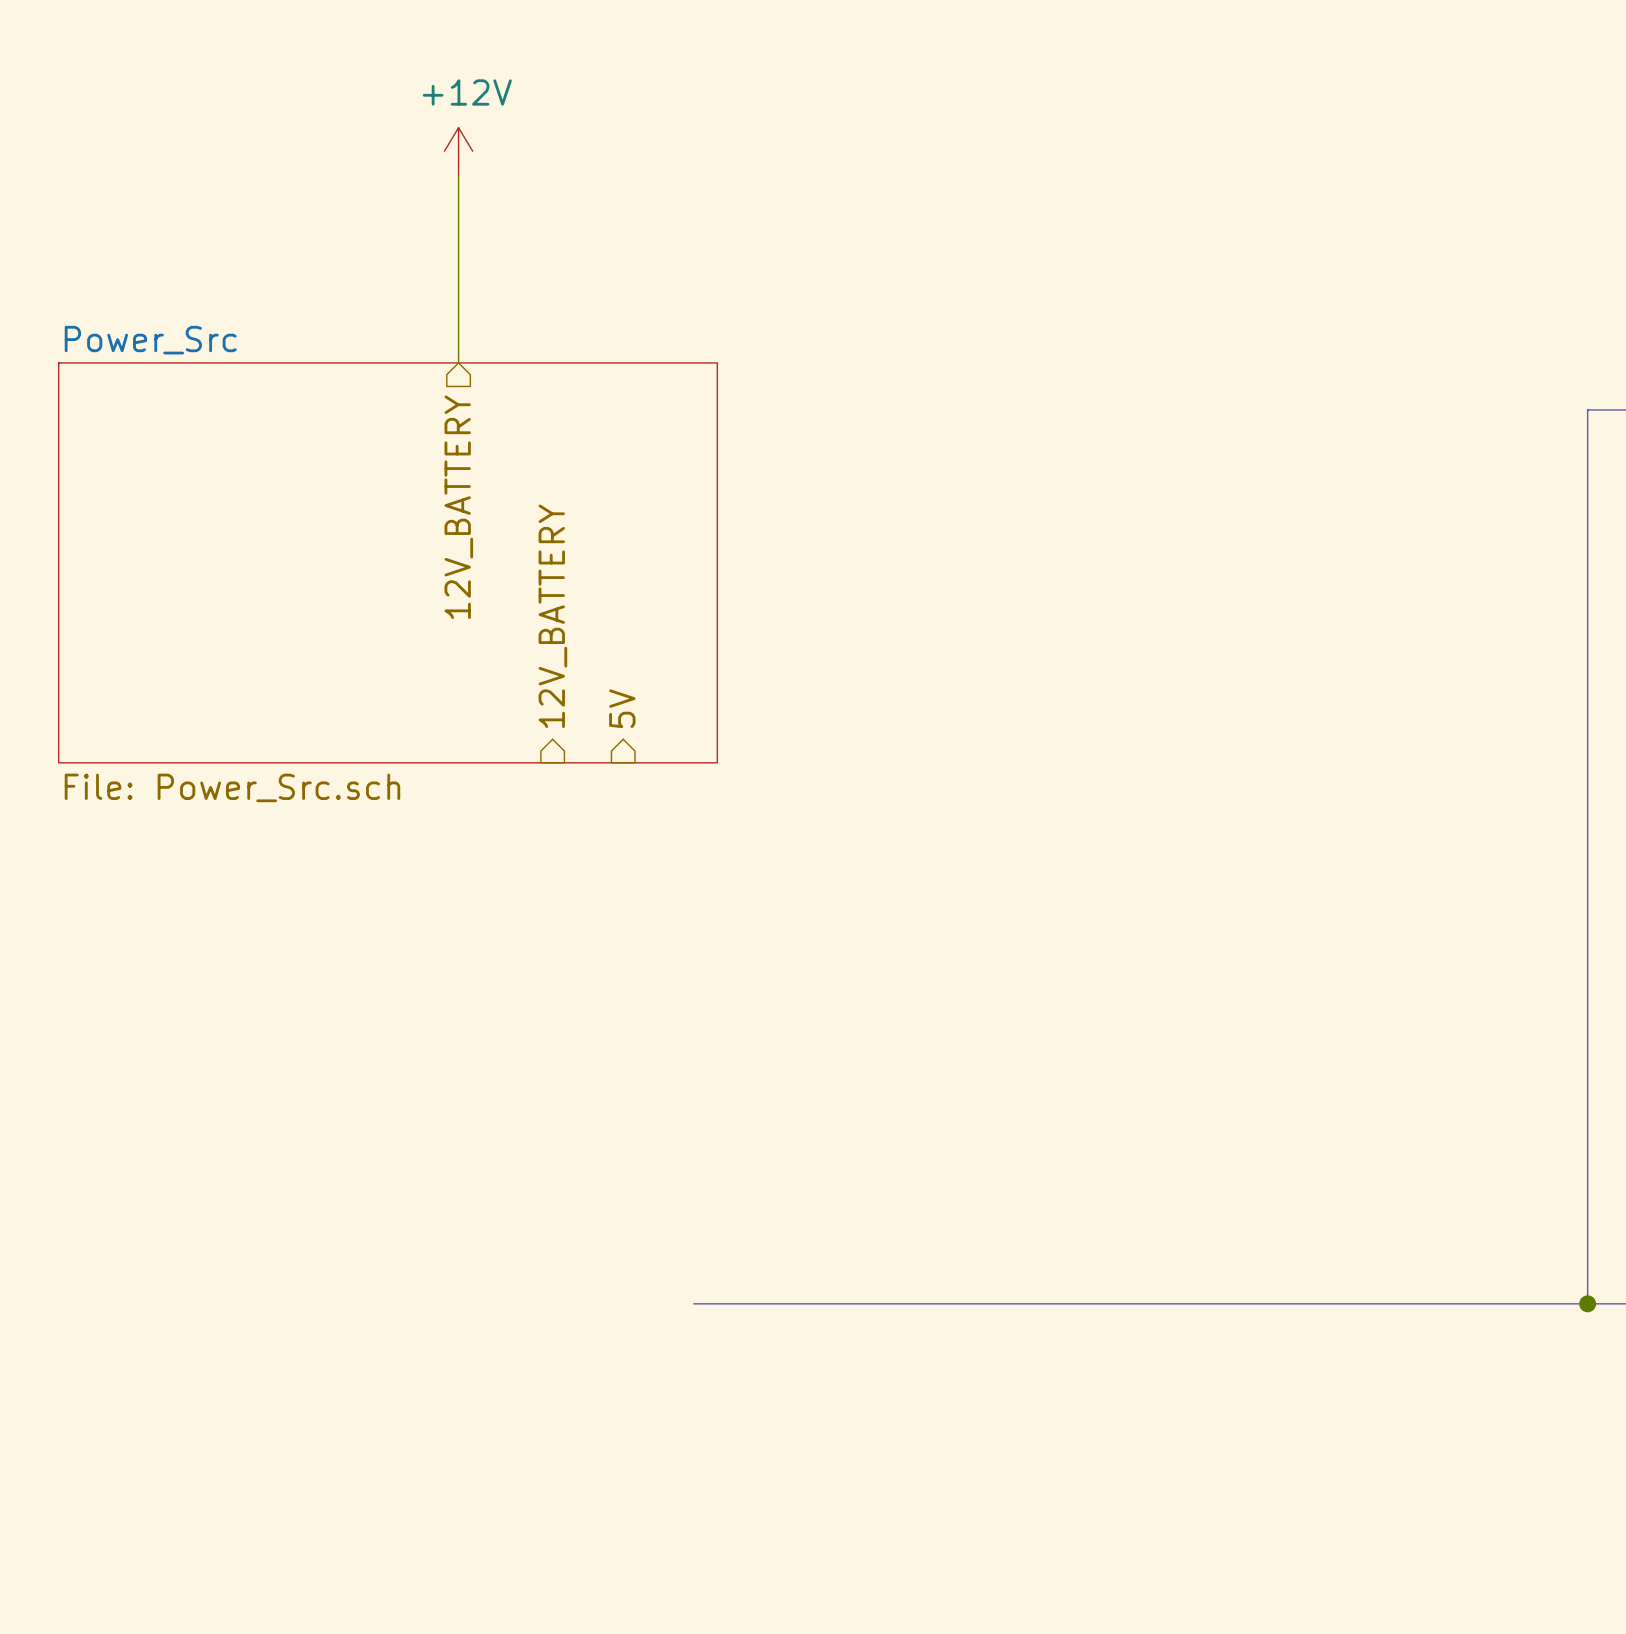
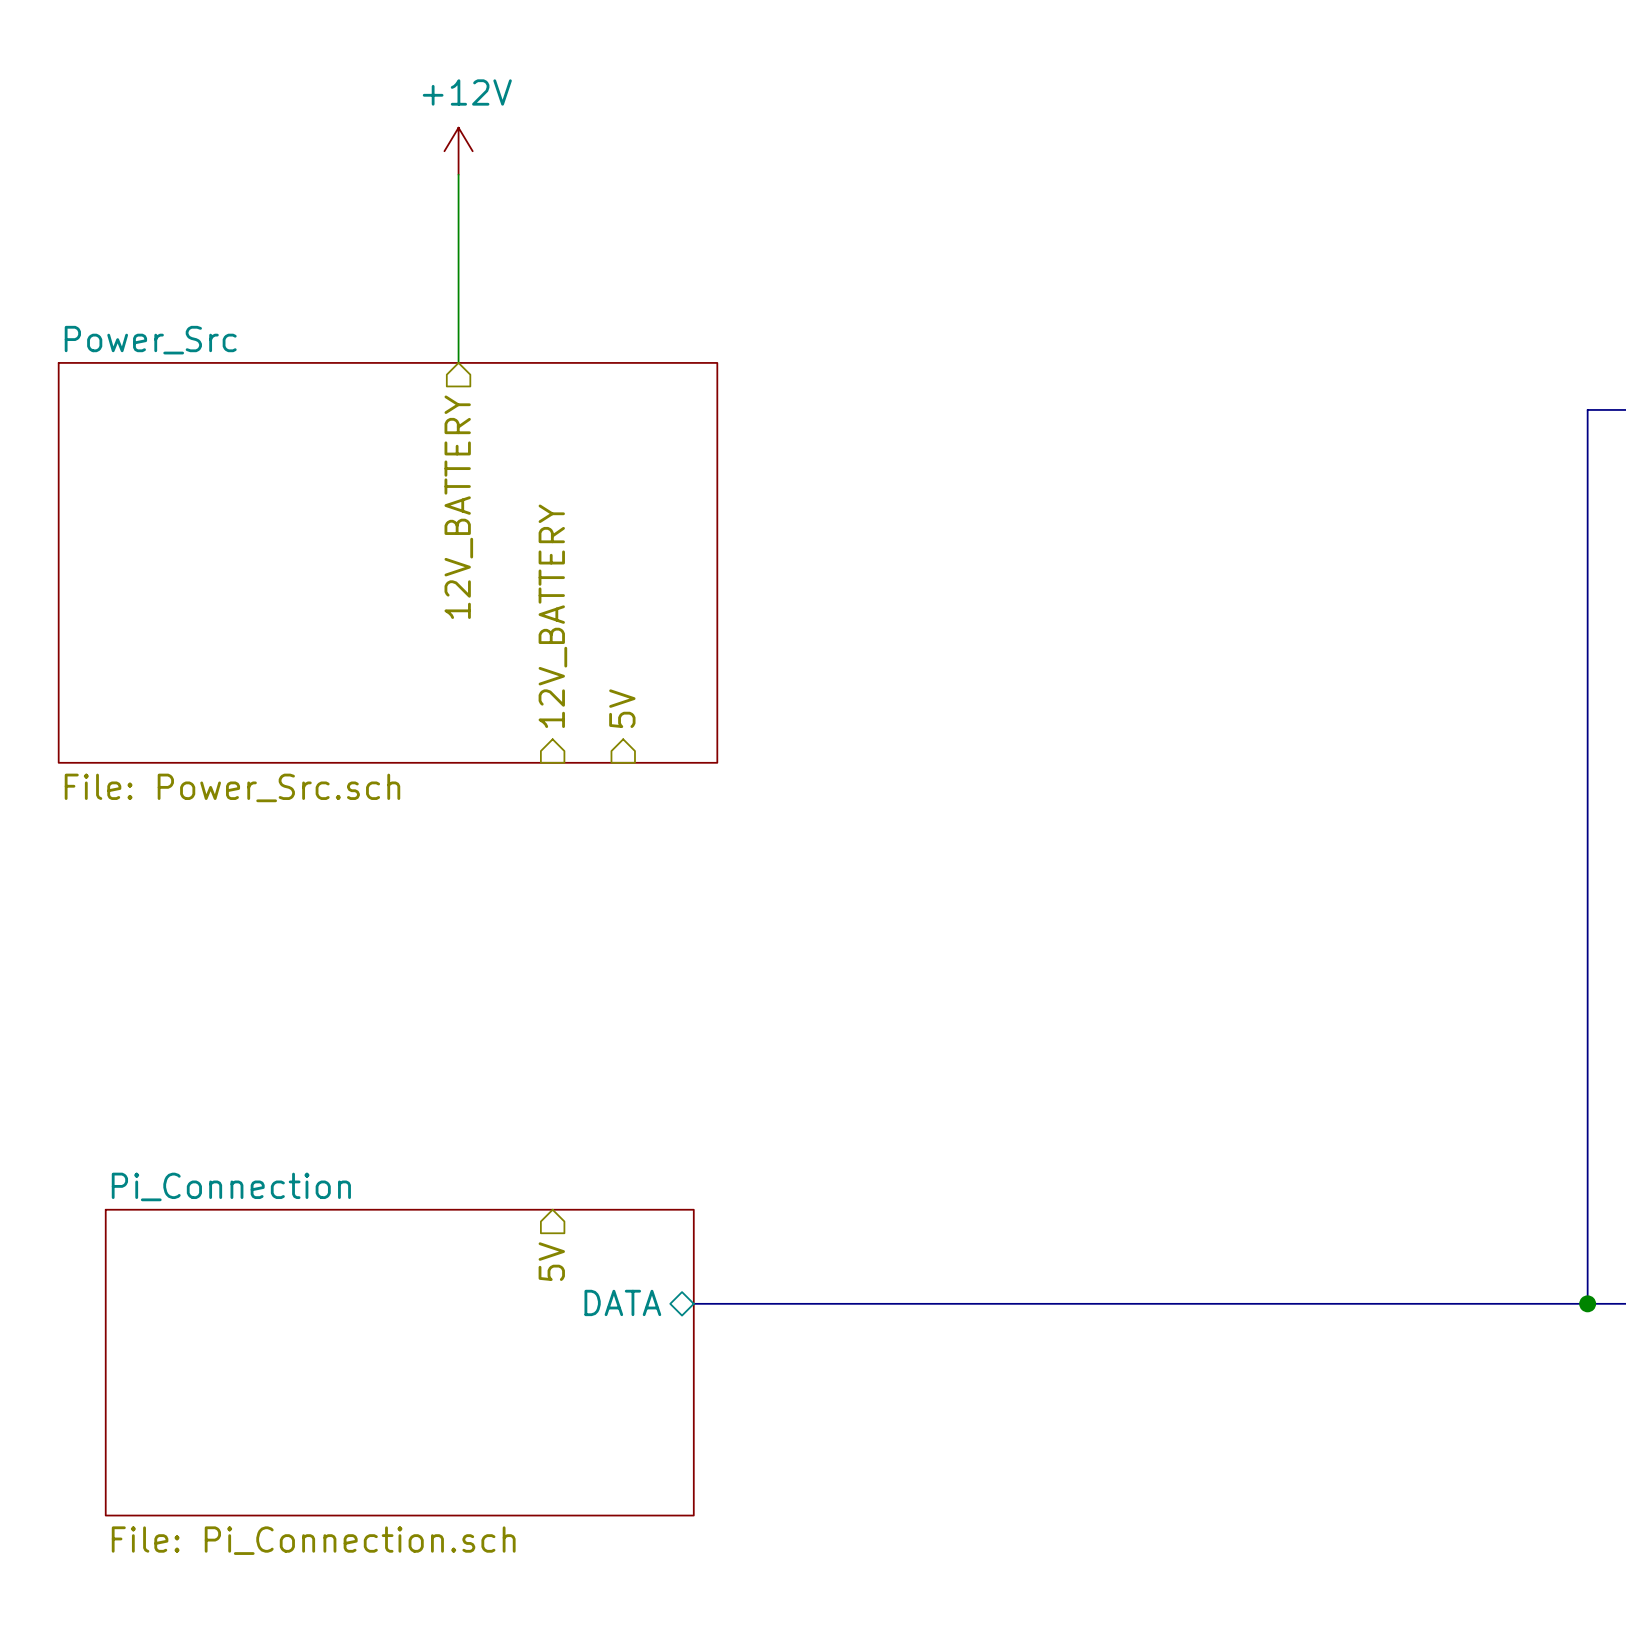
hierarchical label: none -> 5V (551, 1261)
sheet pin: none -> DATA (622, 1302)
sheet Pi_Connection: none -> File: Pi_Connection.sch (399, 1362)

